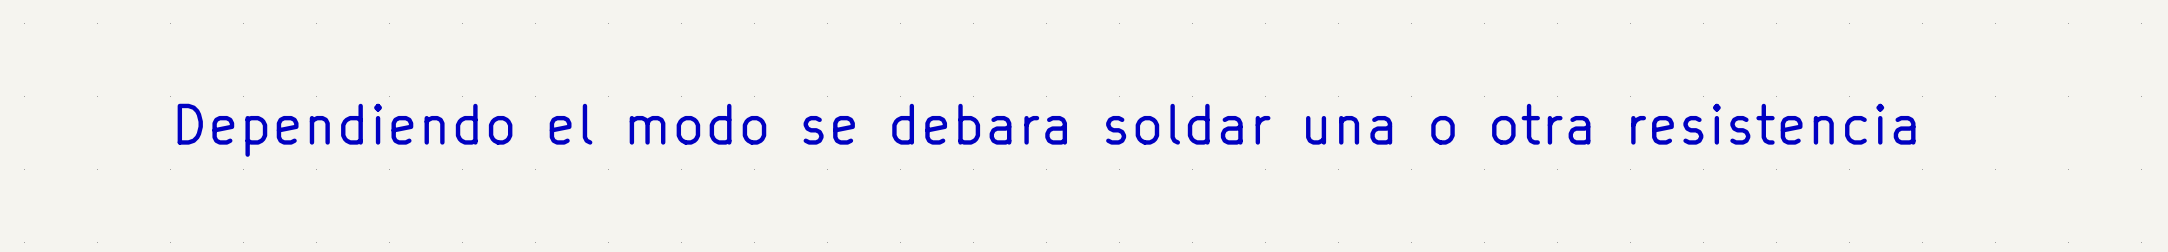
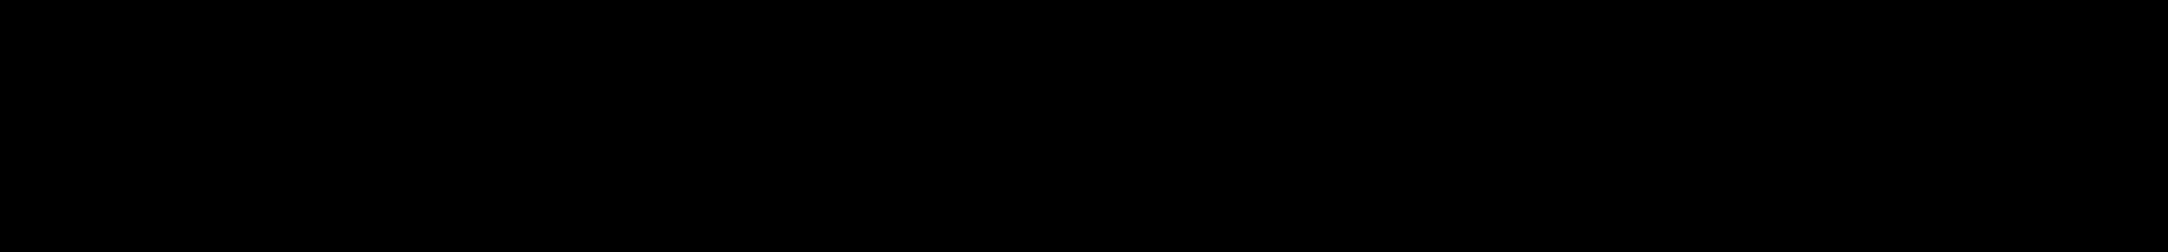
text: Dependiendo el modo se debara soldar una o otra resistencia (1046, 130) -> none

